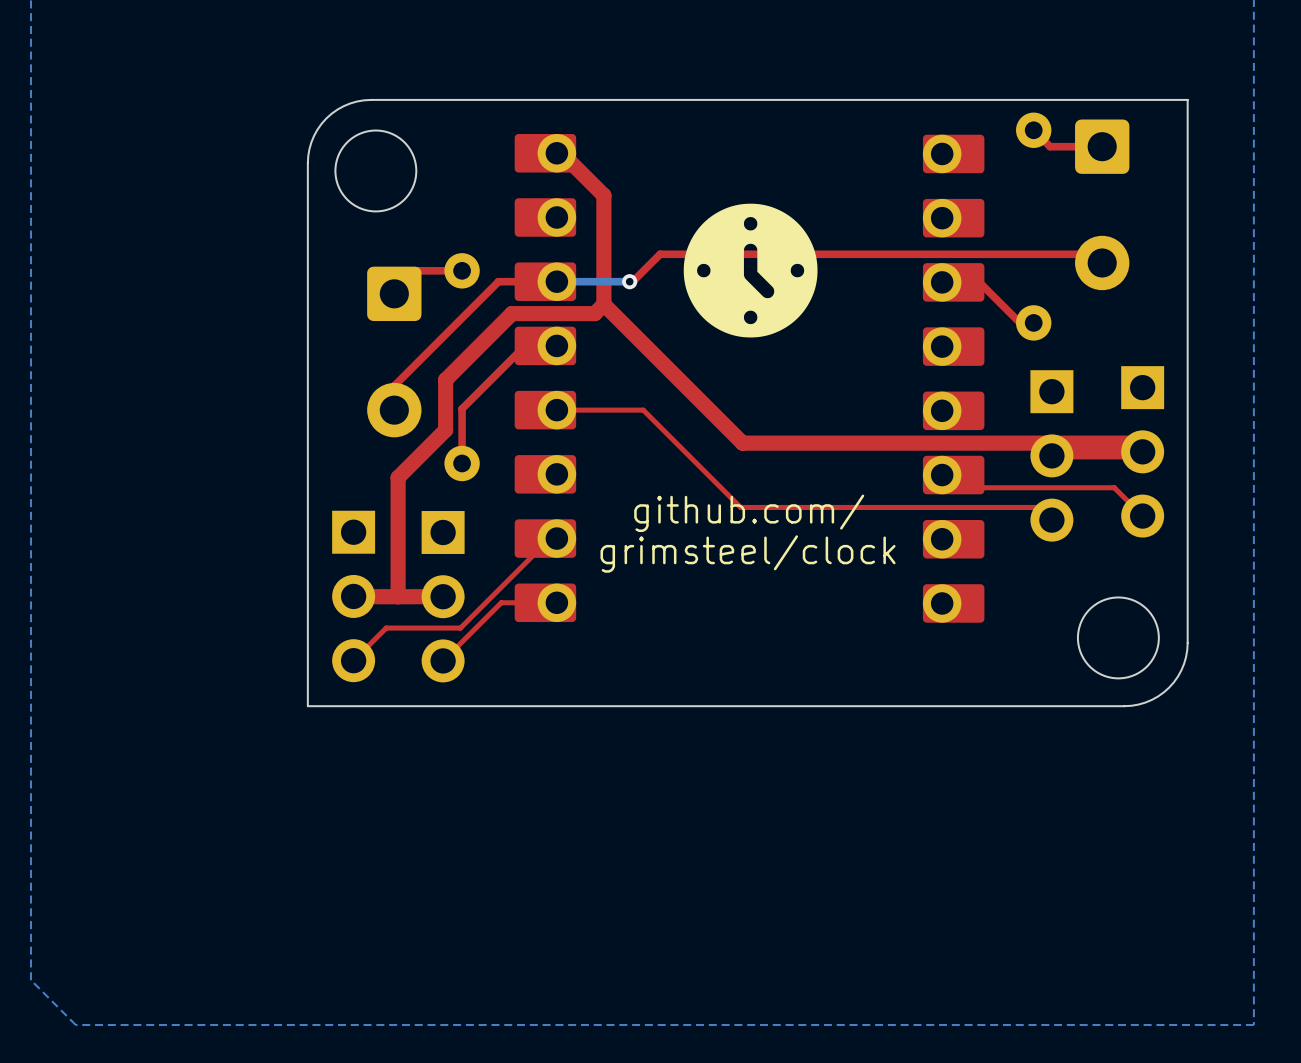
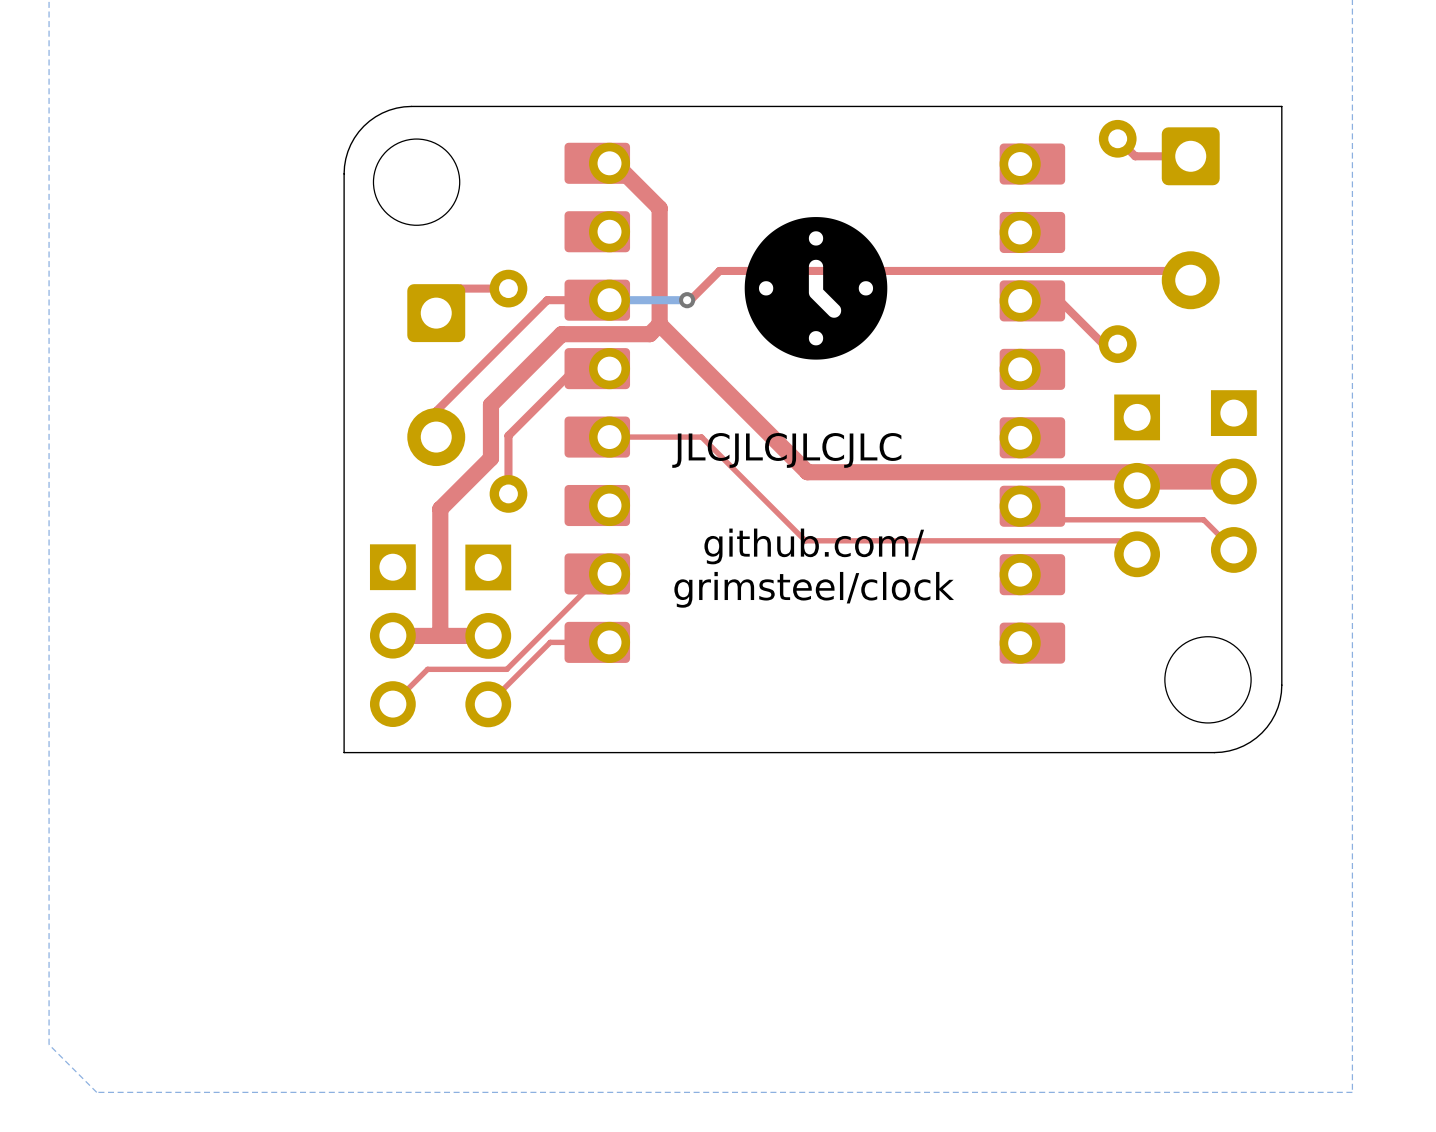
text: none -> JLCJLCJLCJLC (786, 450)

